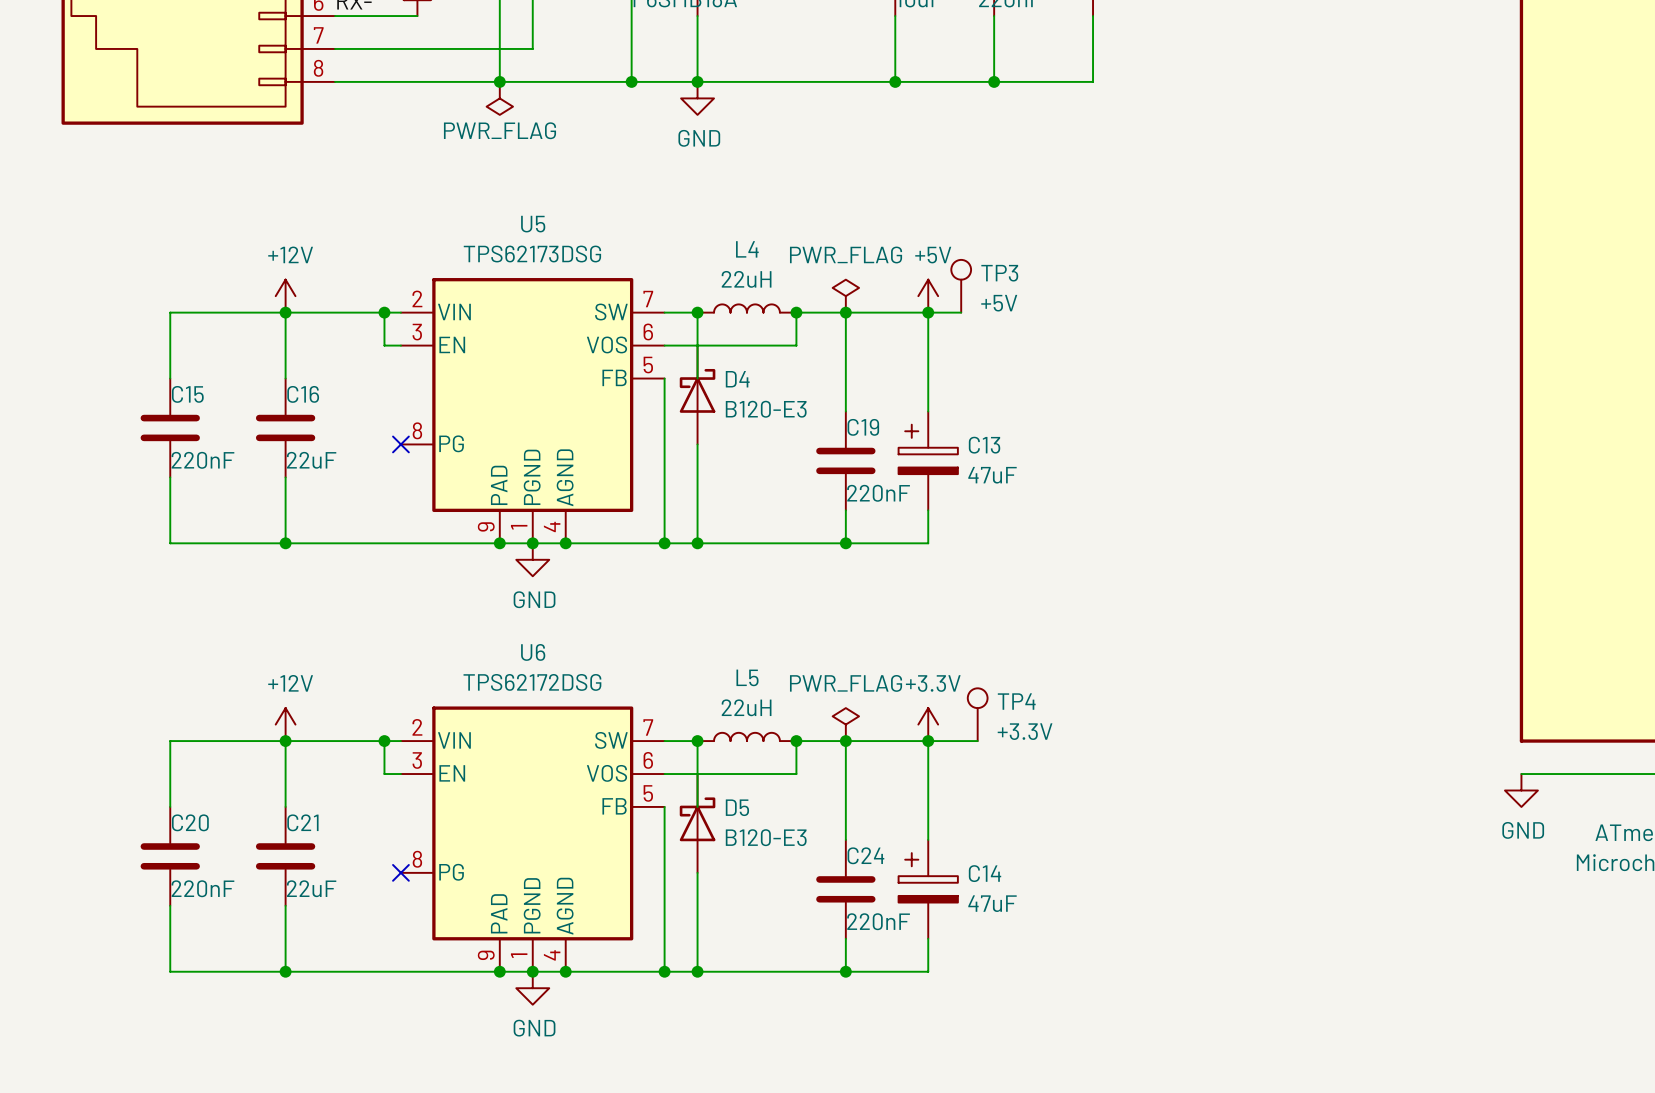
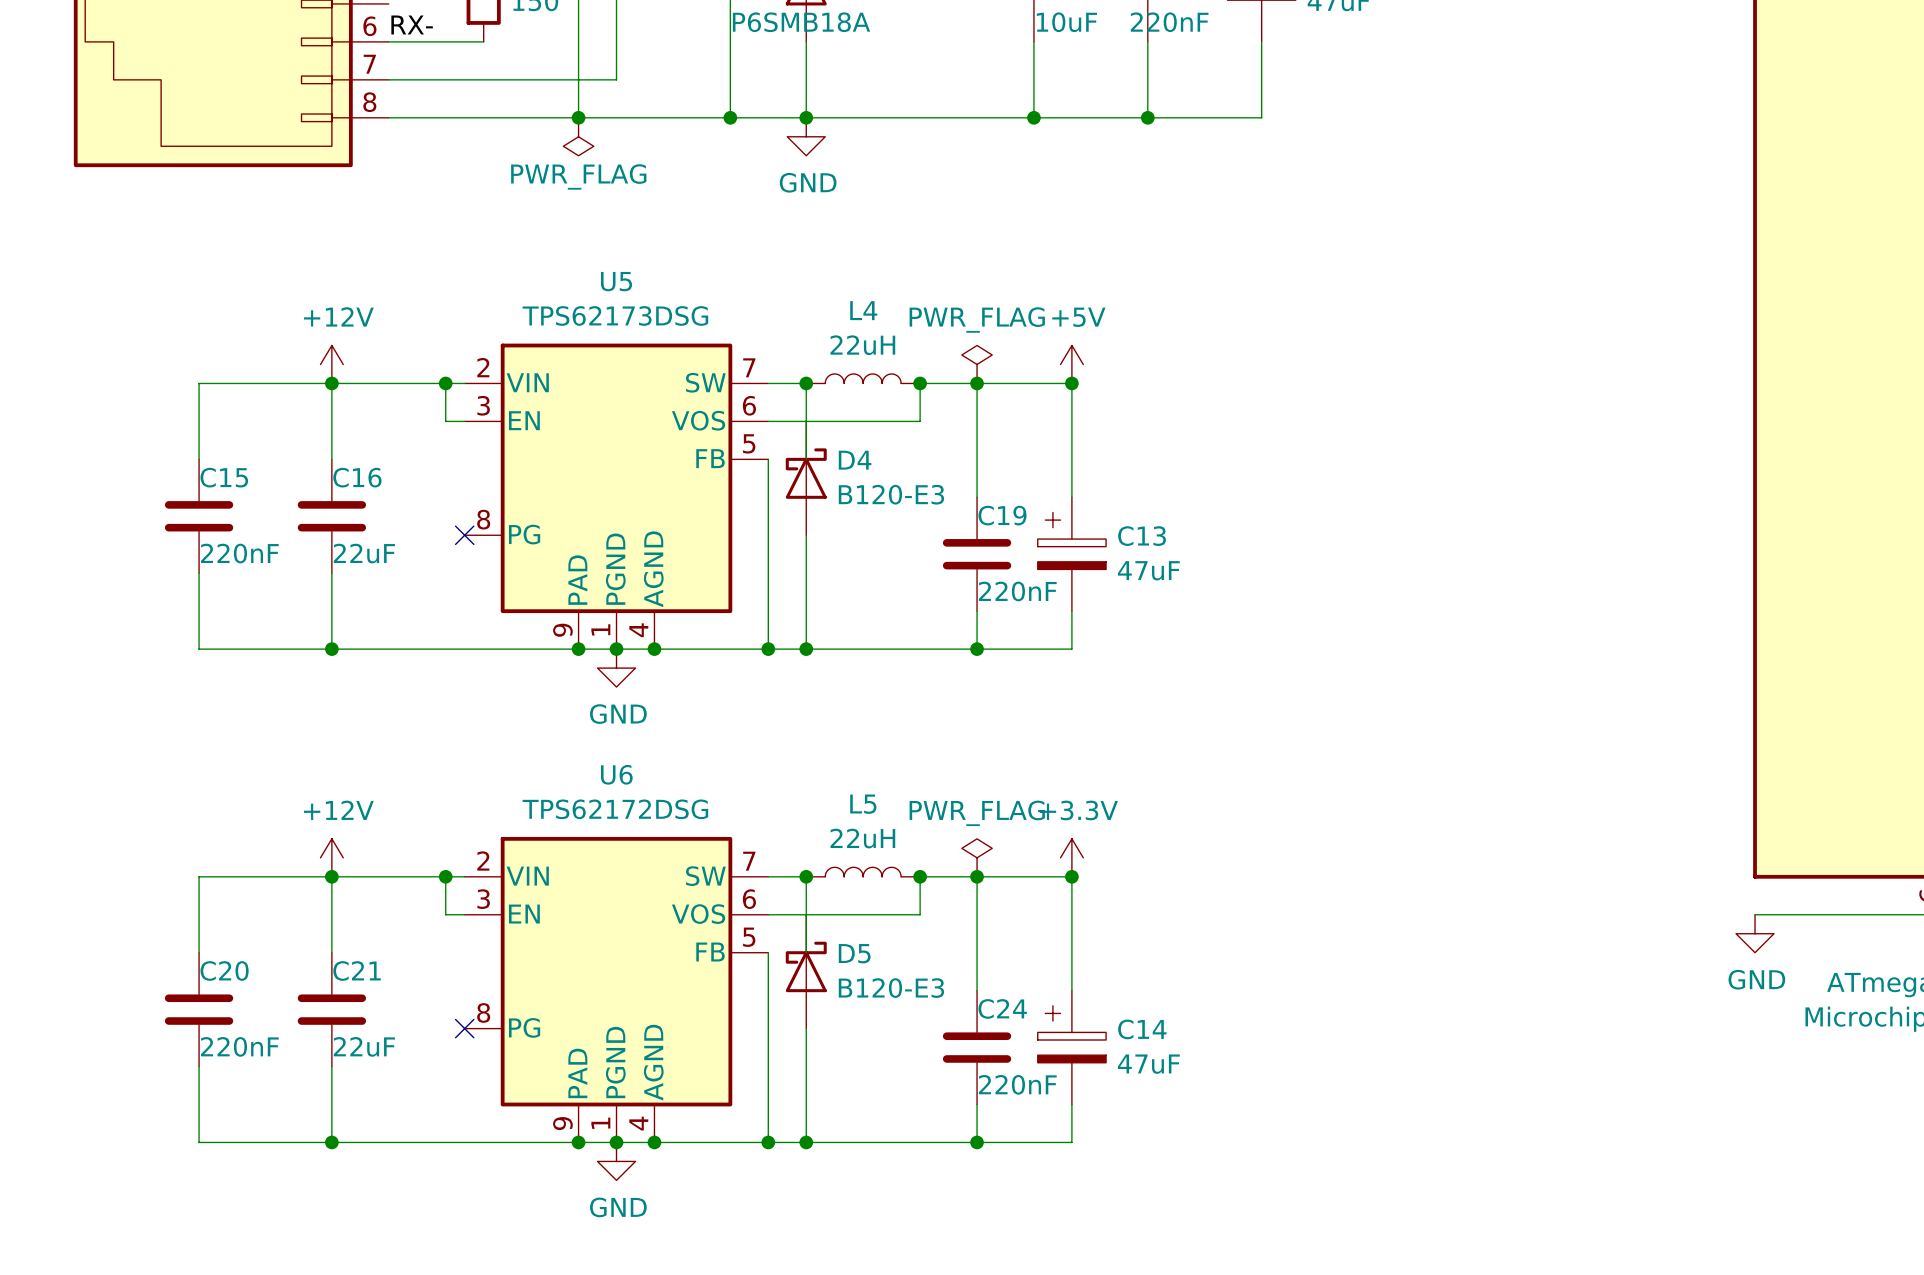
TP3: +5V (961, 286) -> none
wire: (928, 312) (961, 312) -> none
TP4: +3.3V (977, 714) -> none
wire: (928, 741) (977, 741) -> none

